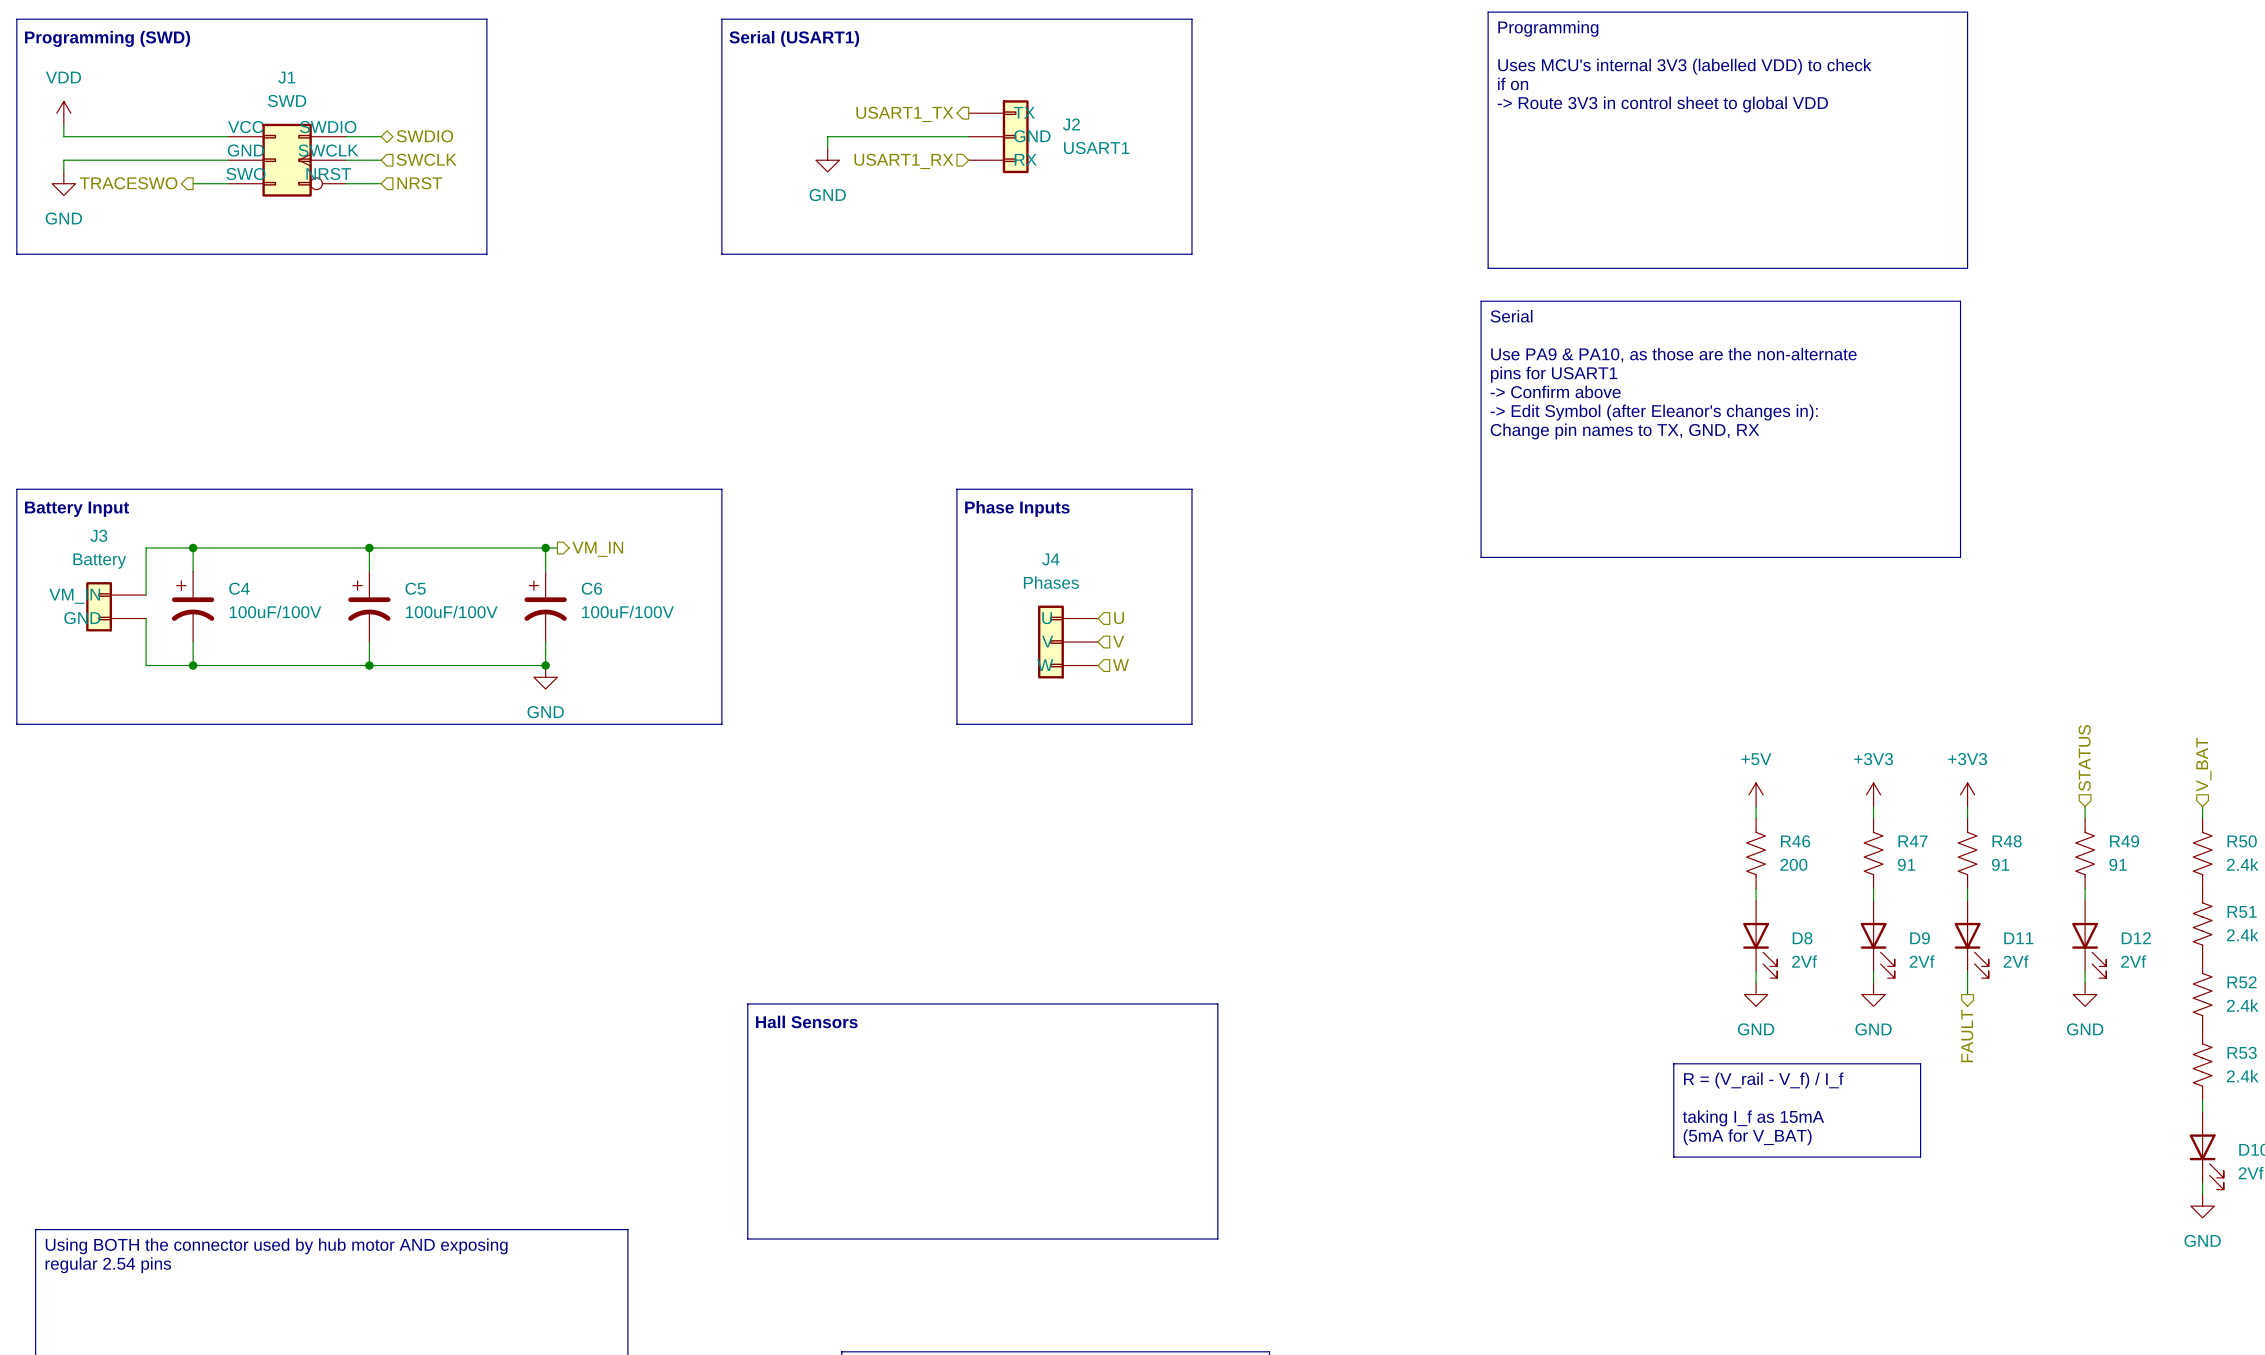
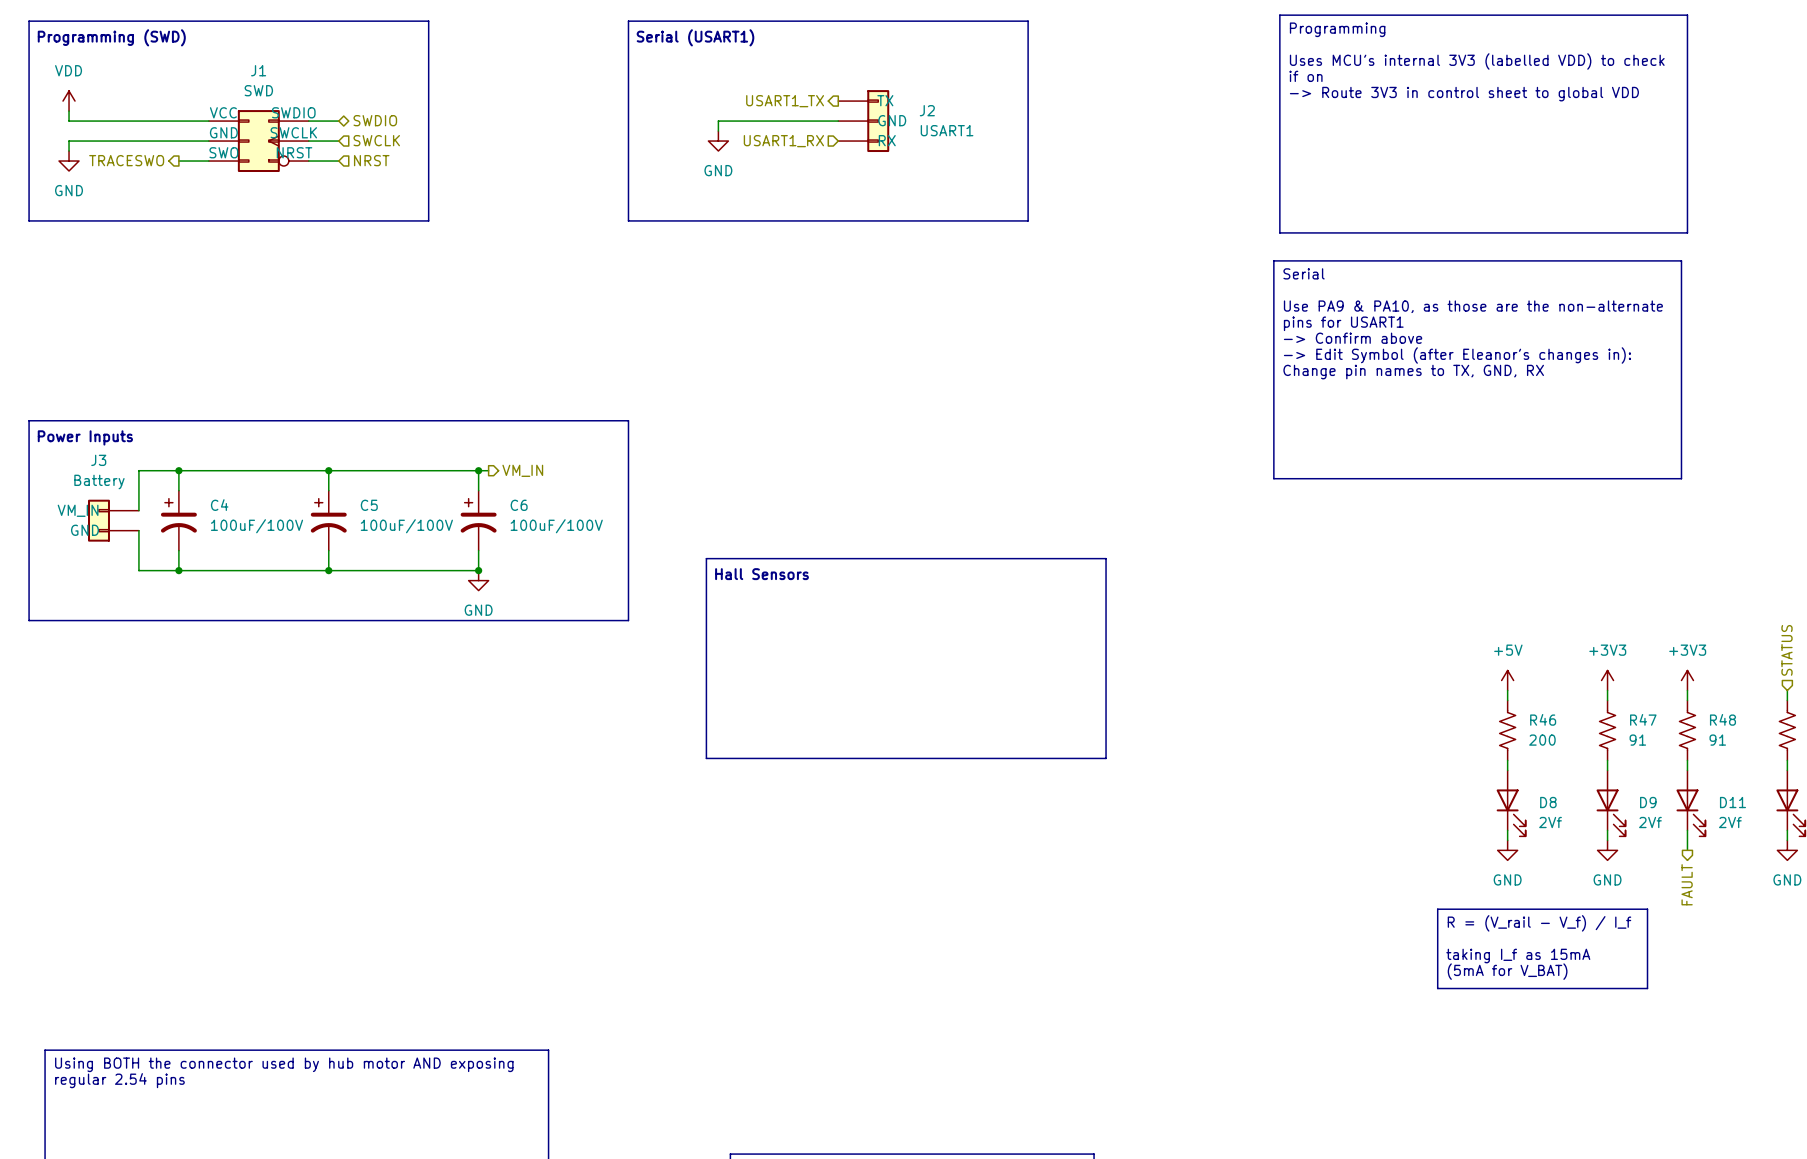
line: (956, 489) (1191, 489) (1191, 724) (956, 724) (956, 489) -> none
text: Phase Inputs (1017, 508) -> none
text: Battery Input (77, 509) -> Power Inputs (85, 437)
hierarchical label: U (1119, 618) -> none
hierarchical label: V (1118, 641) -> none
J4: Phases (1068, 642) -> none
line: none -> (706, 558) (1106, 558) (1106, 758) (706, 758) (706, 558)
hierarchical label: W (1120, 665) -> none
text: none -> Hall Sensors (762, 574)
line: (747, 1003) (1217, 1003) (1217, 1239) (747, 1239) (747, 1003) -> none
text: Hall Sensors (806, 1021) -> none

